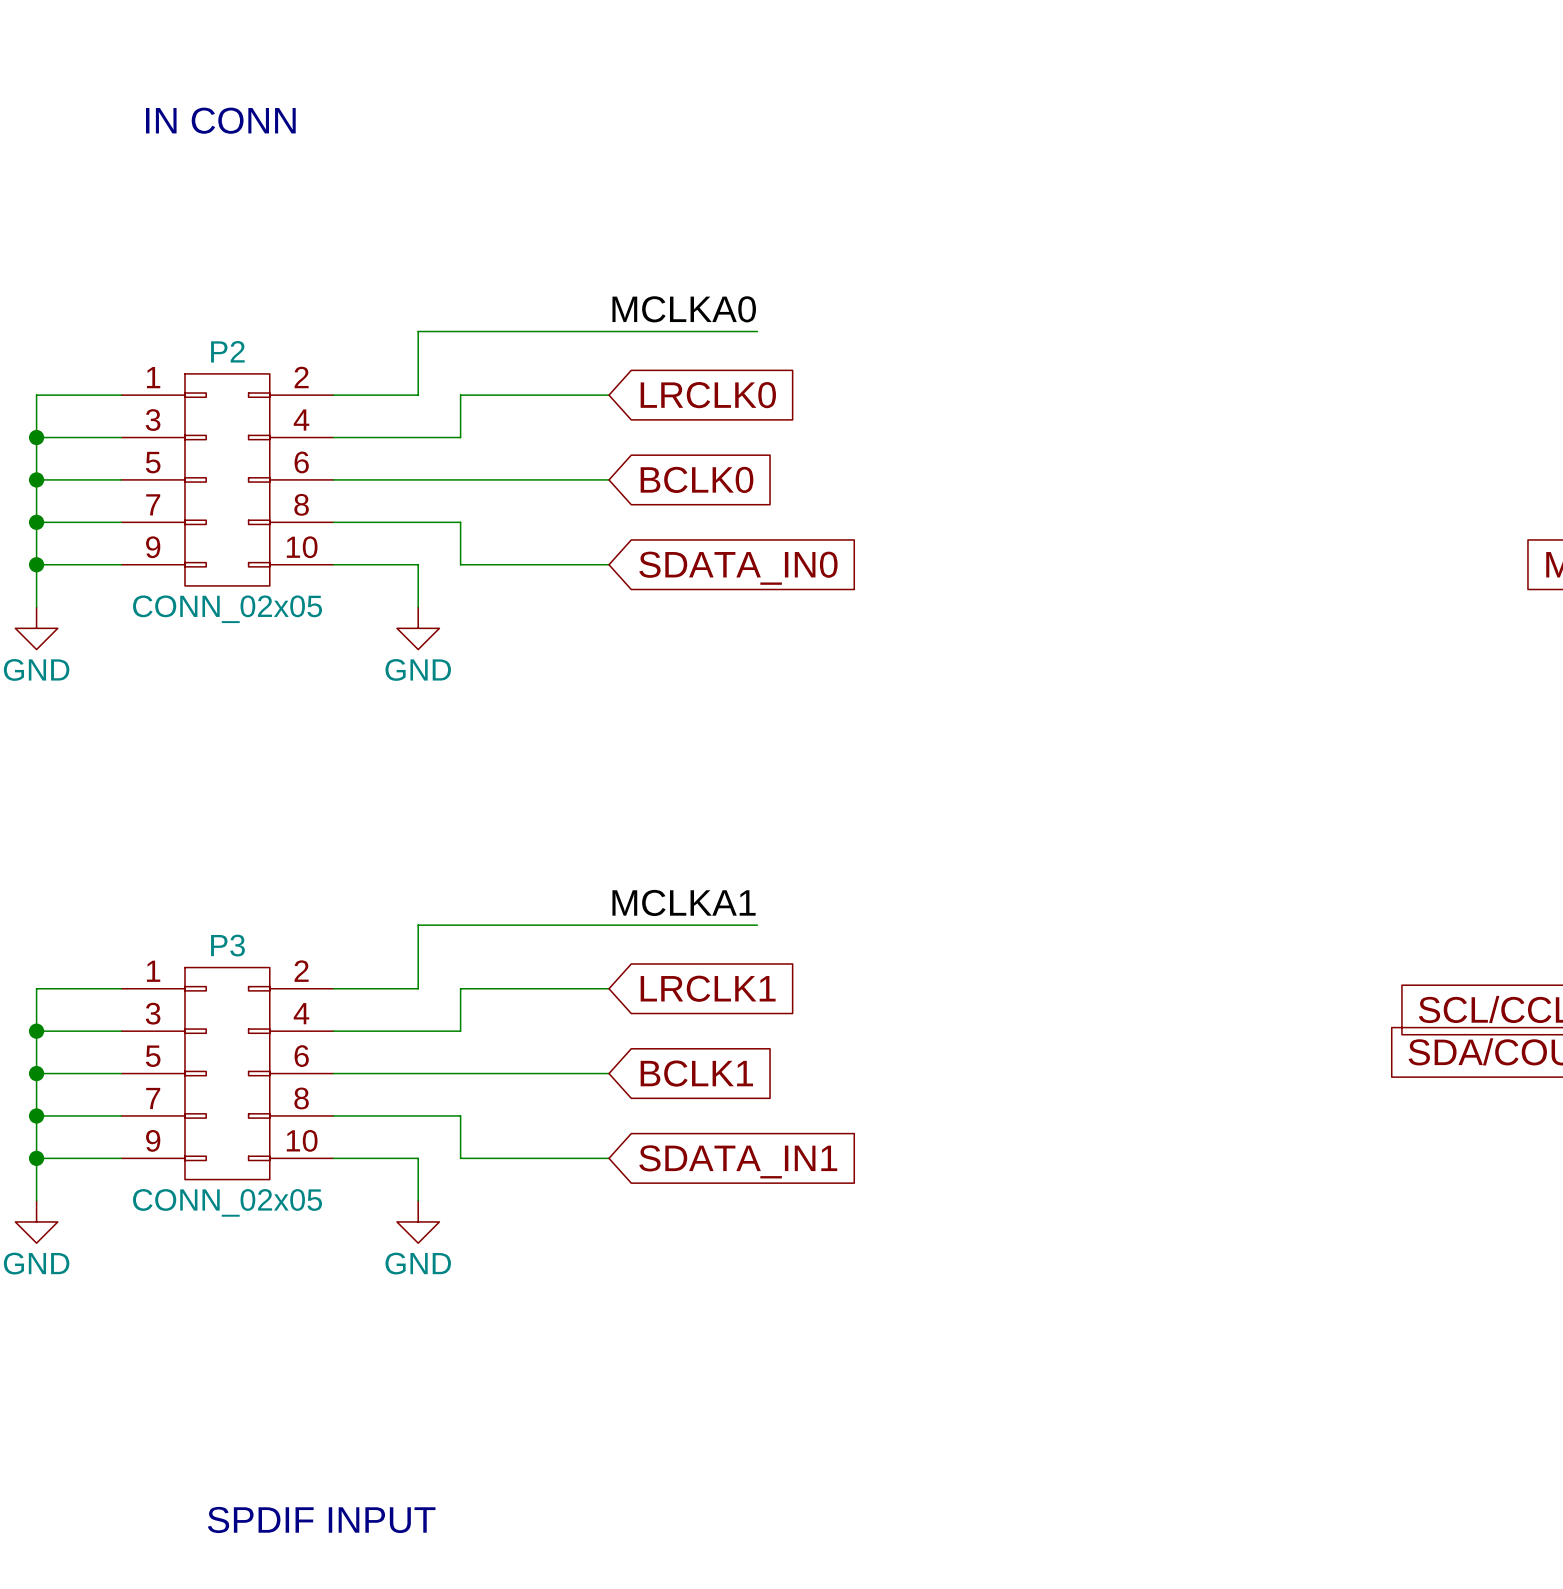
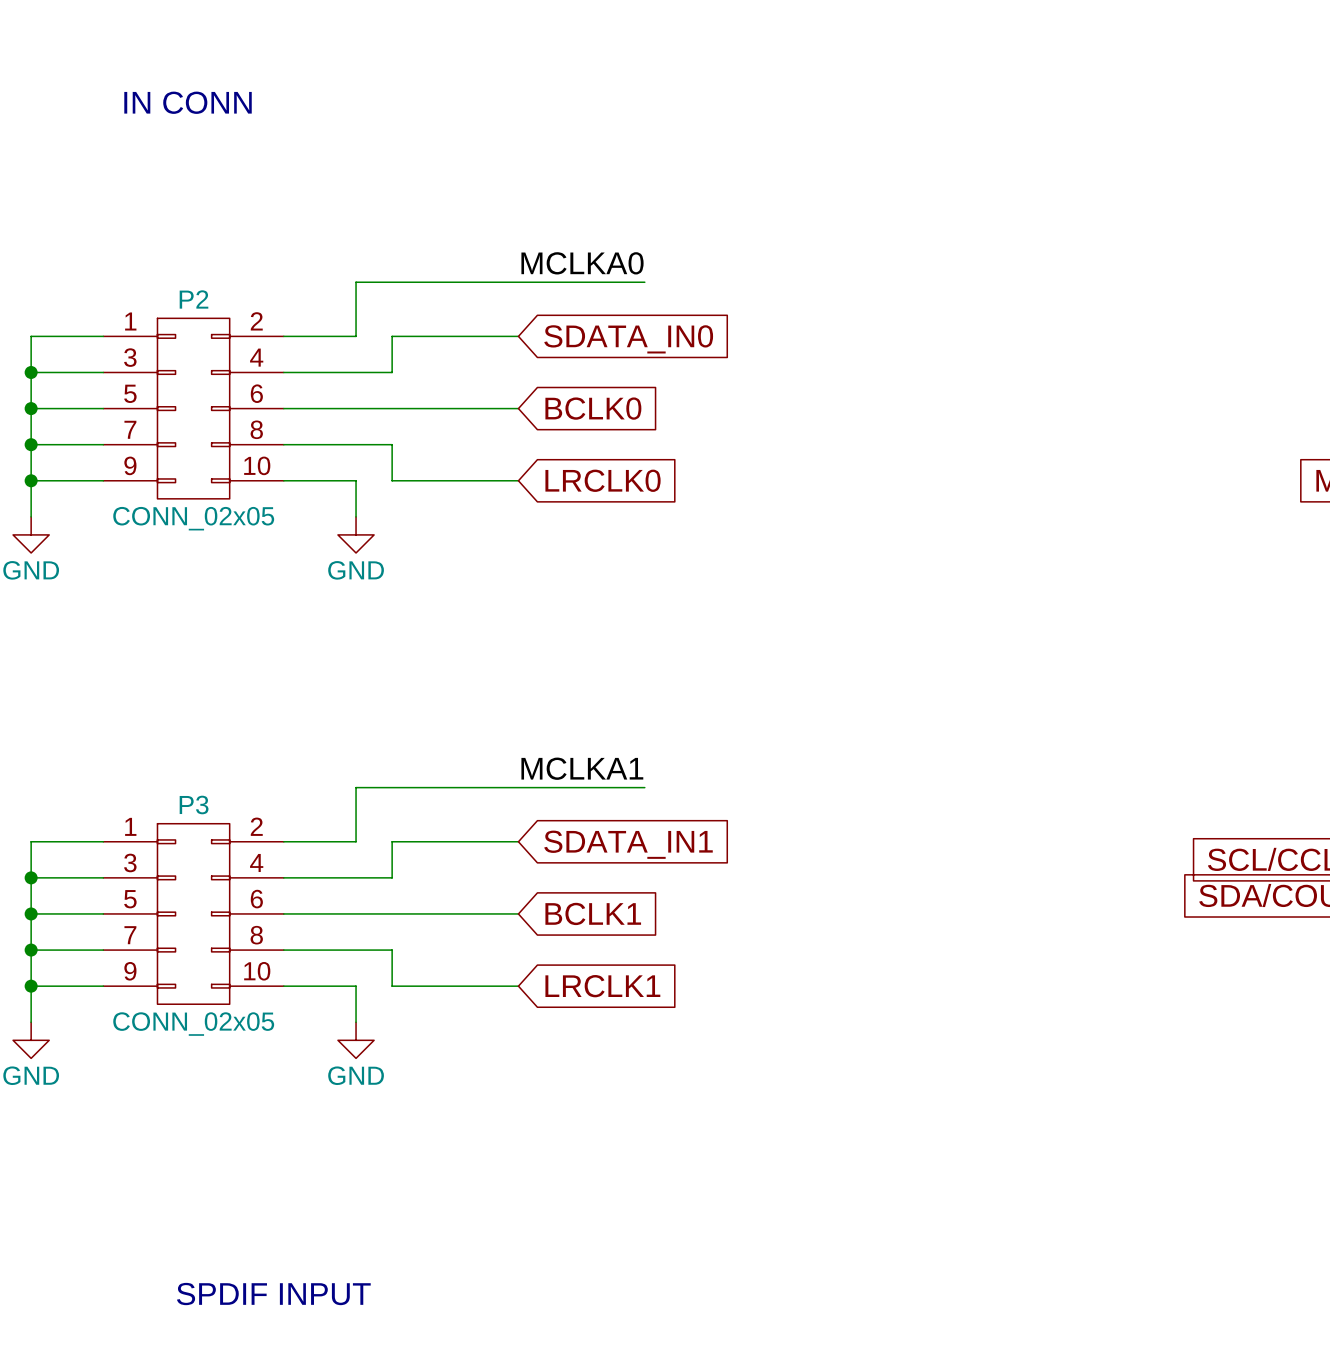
global label: LRCLK0 (708, 395) -> SDATA_IN0 (628, 339)
global label: SDATA_IN0 (738, 568) -> LRCLK0 (603, 480)
global label: LRCLK1 (708, 988) -> SDATA_IN1 (628, 844)
global label: SDATA_IN1 (738, 1161) -> LRCLK1 (602, 986)

